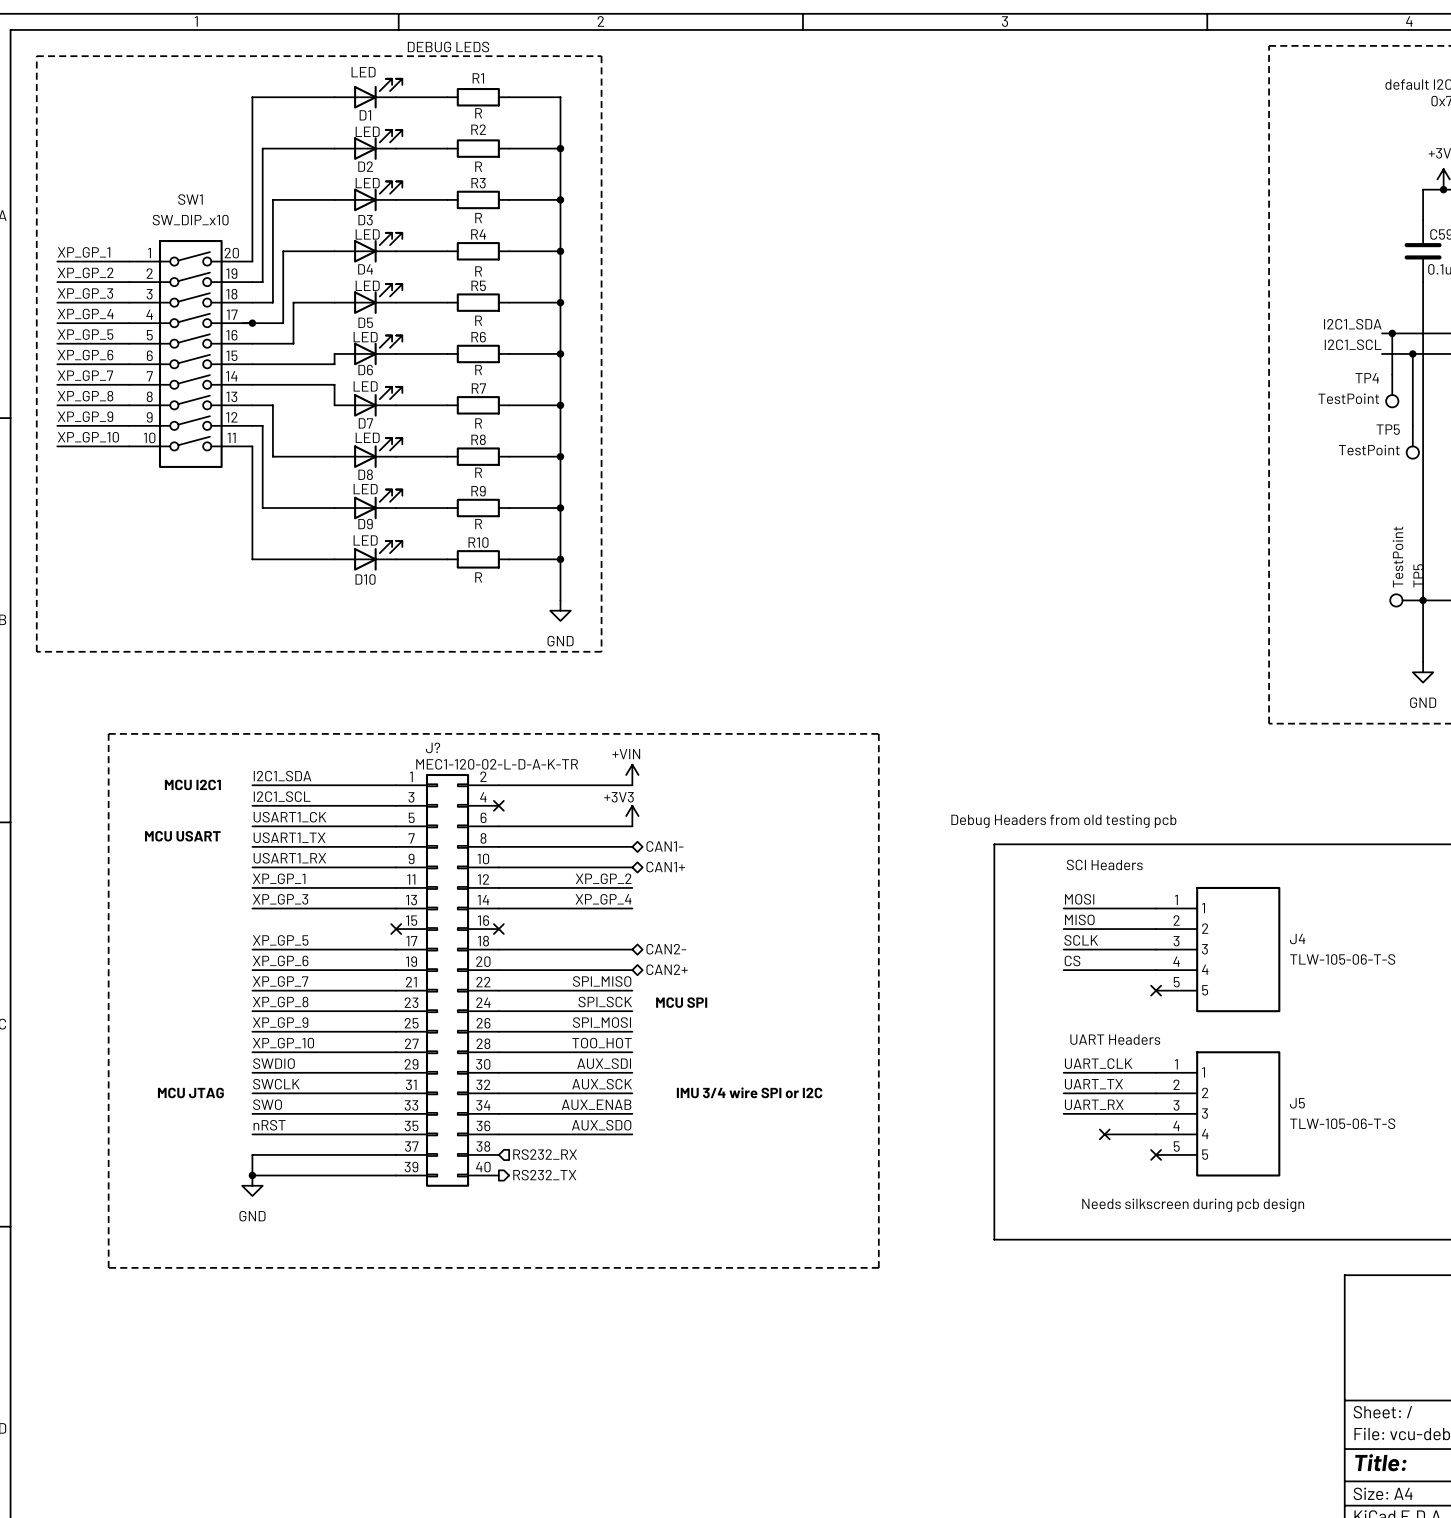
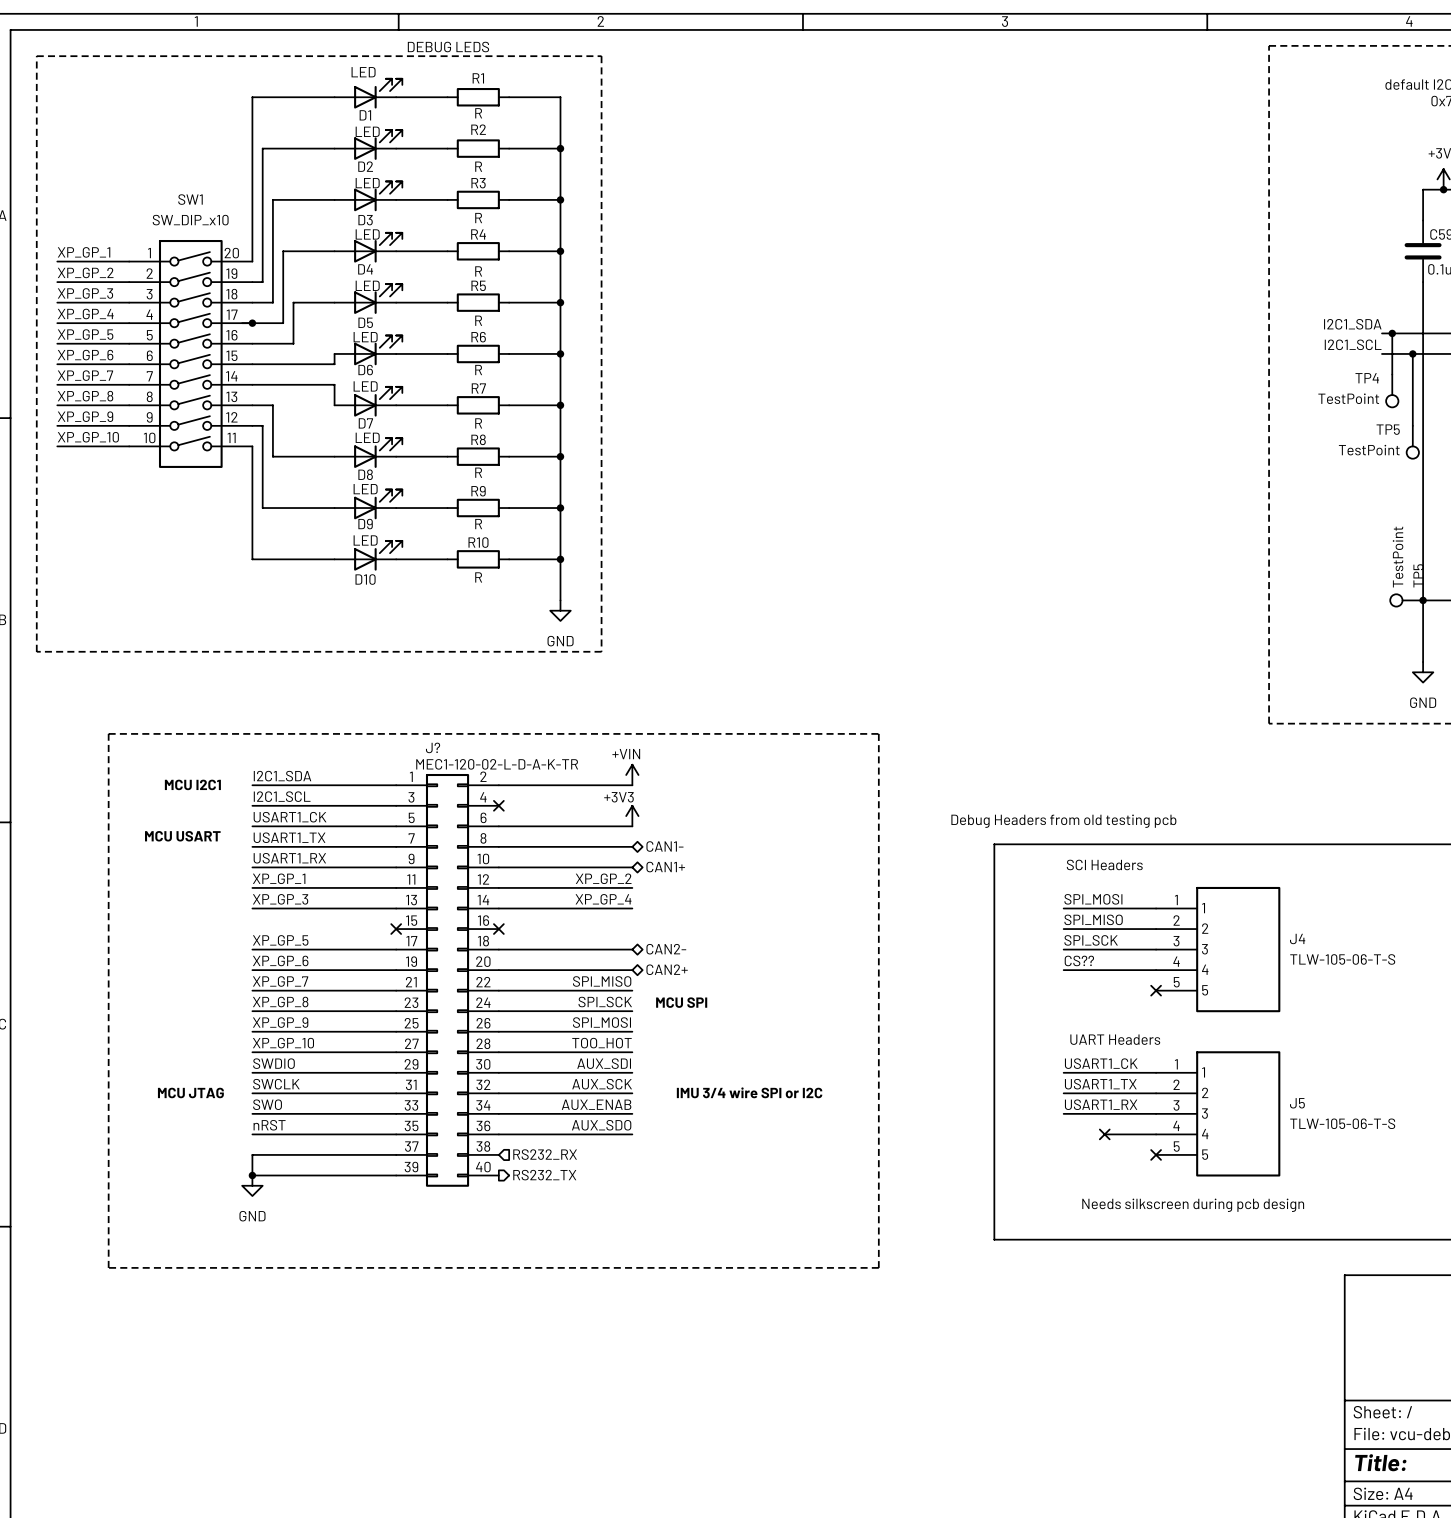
label: MOSI (1079, 899) -> SPI_MOSI (1093, 899)
label: MISO (1079, 919) -> SPI_MISO (1093, 919)
label: SCLK (1081, 940) -> SPI_SCK (1091, 940)
label: CS (1072, 960) -> CS?? (1079, 960)
label: UART_CLK (1098, 1063) -> USART1_CK (1101, 1063)
label: UART_TX (1093, 1084) -> USART1_TX (1100, 1084)
label: UART_RX (1094, 1104) -> USART1_RX (1101, 1104)

